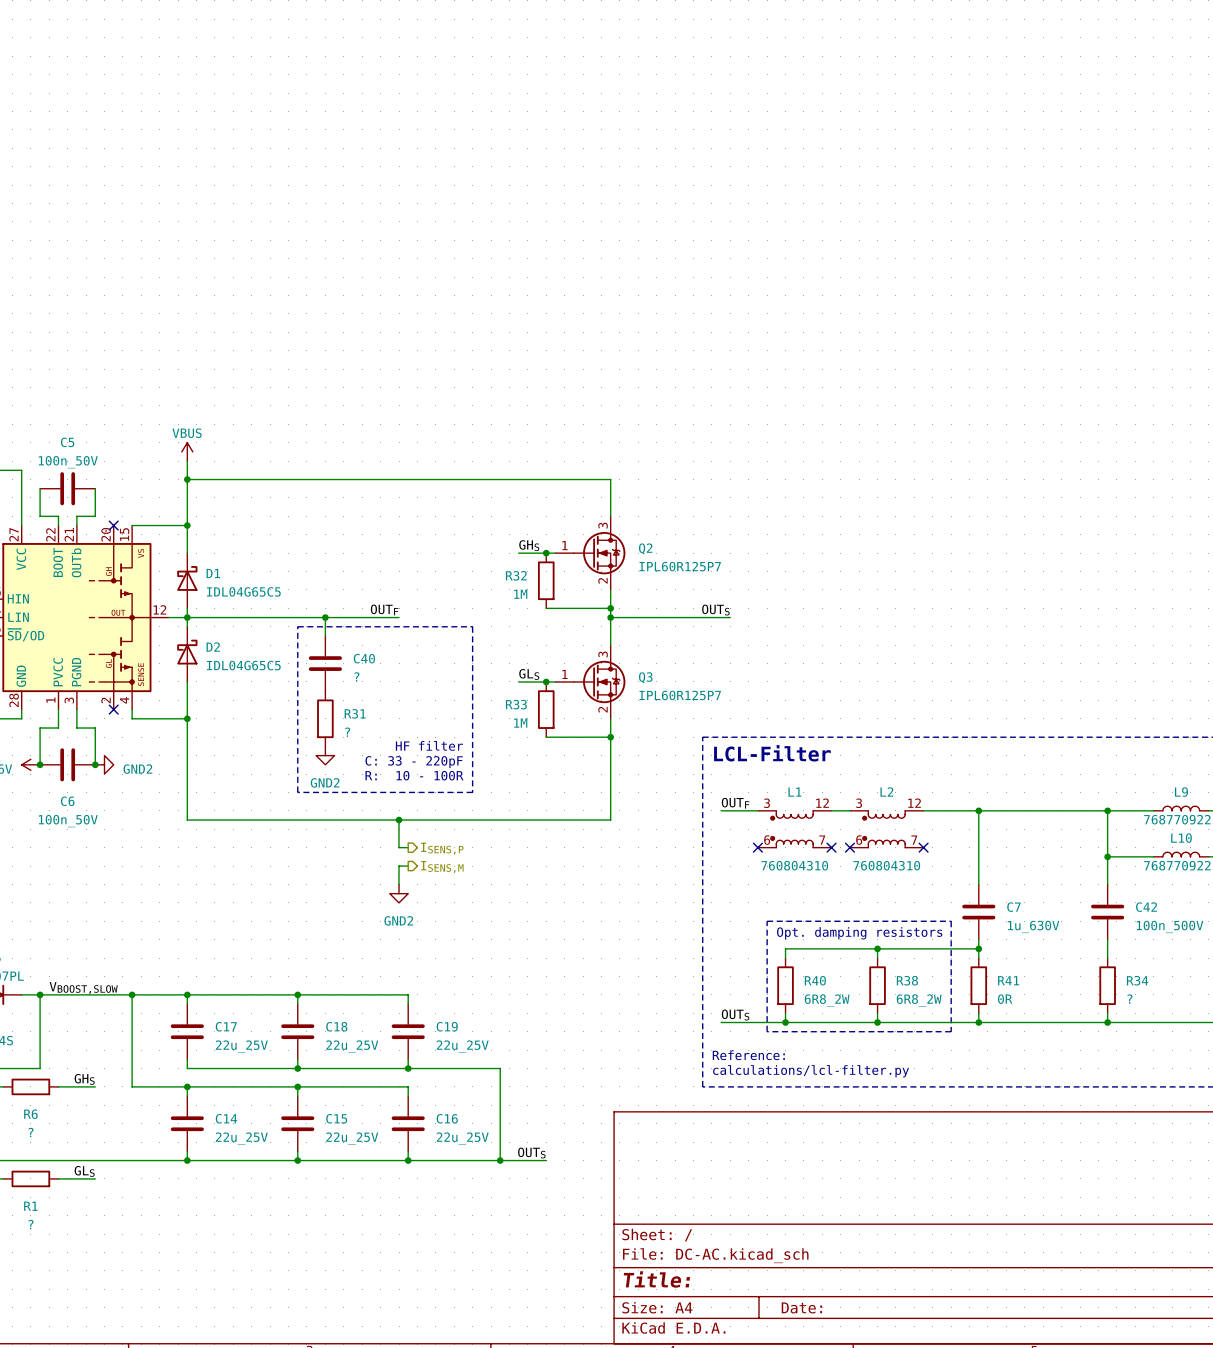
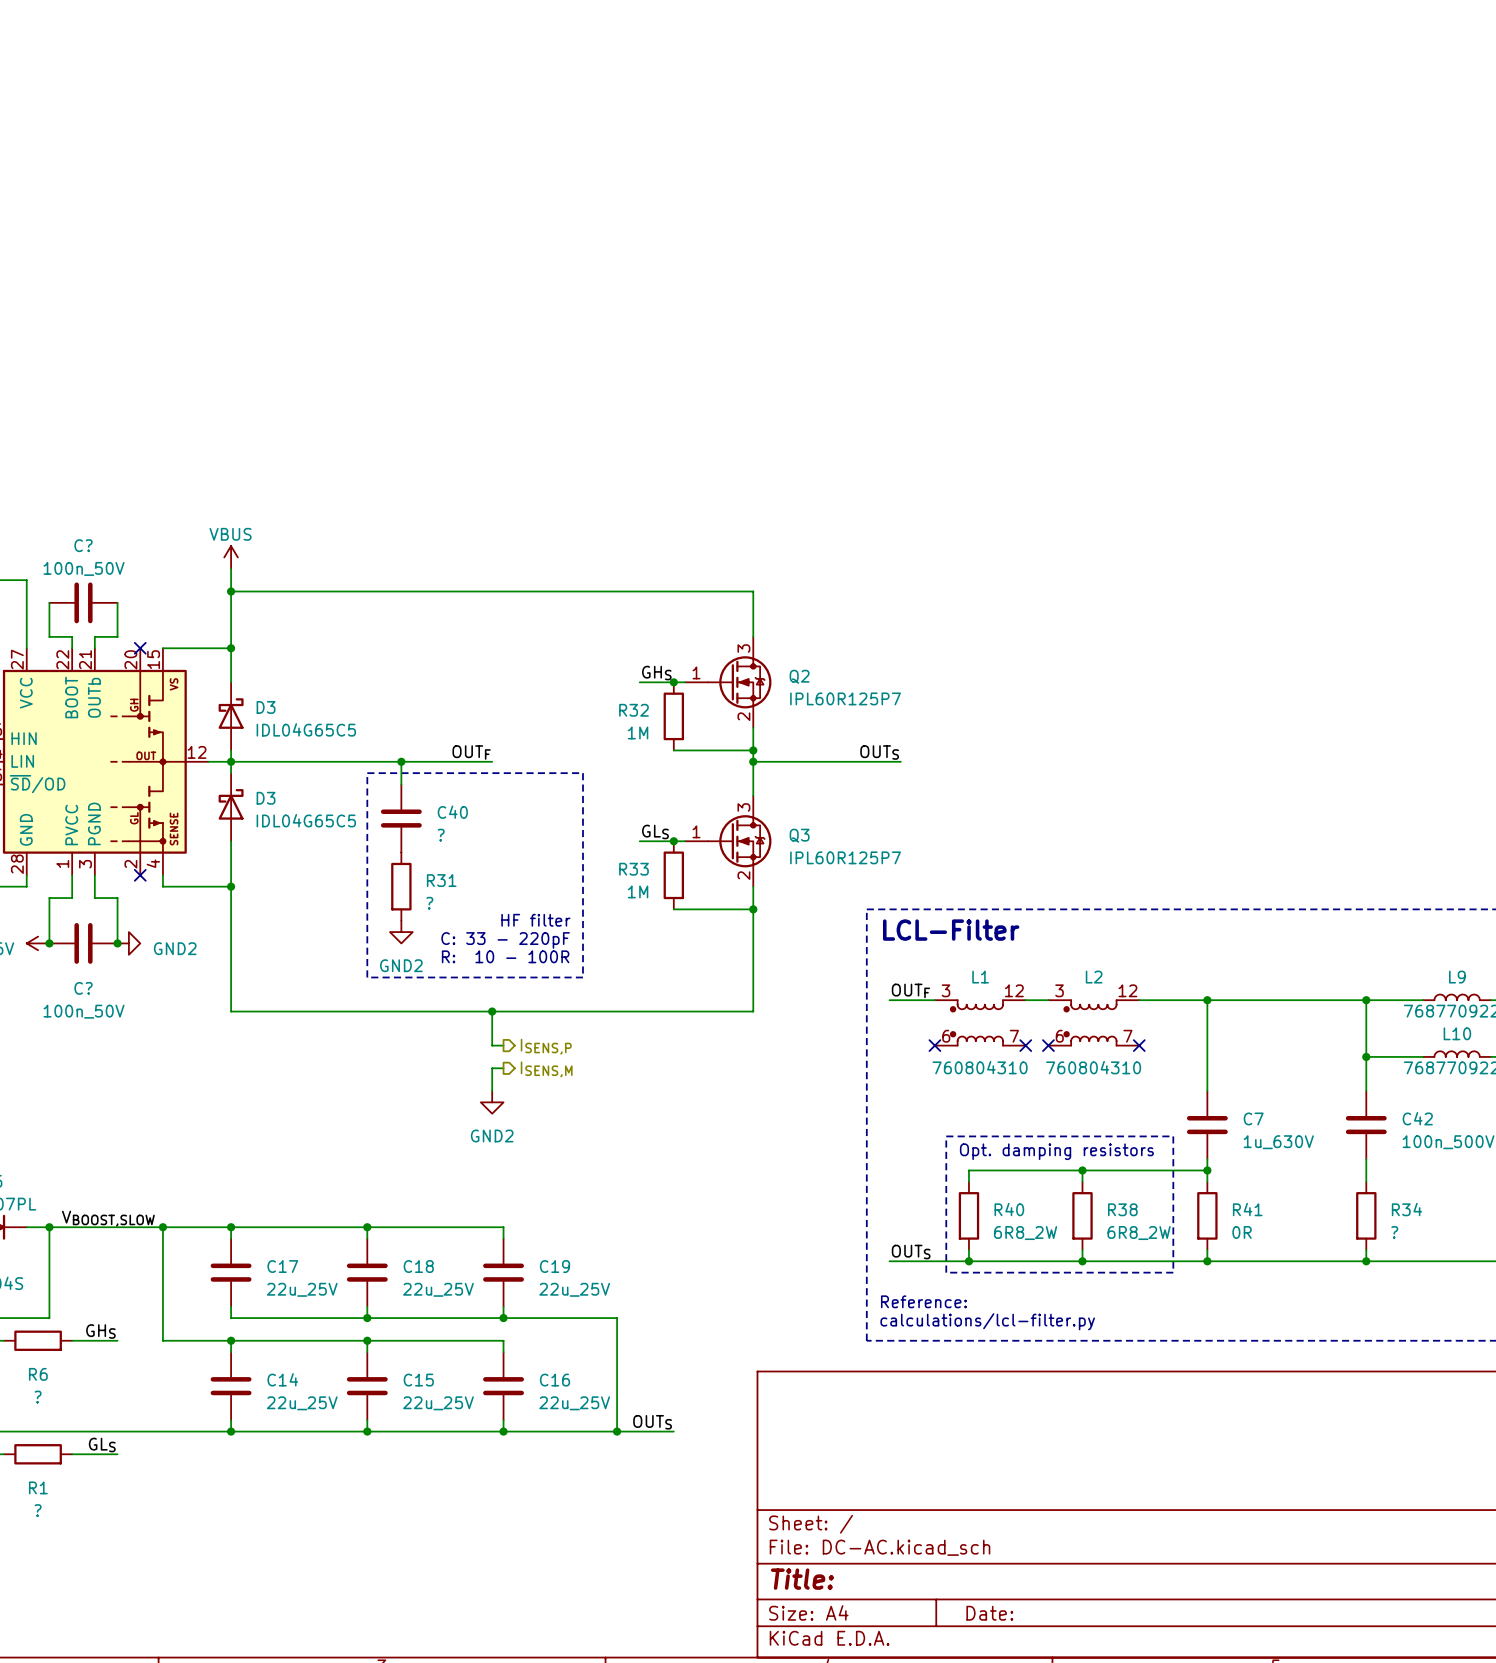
C5 name: C5 (67, 442) -> C? (83, 545)
D1 name: D1 (213, 573) -> D3 (266, 707)
D2 name: D2 (213, 647) -> D3 (266, 798)
C6 name: C6 (67, 801) -> C? (83, 988)

